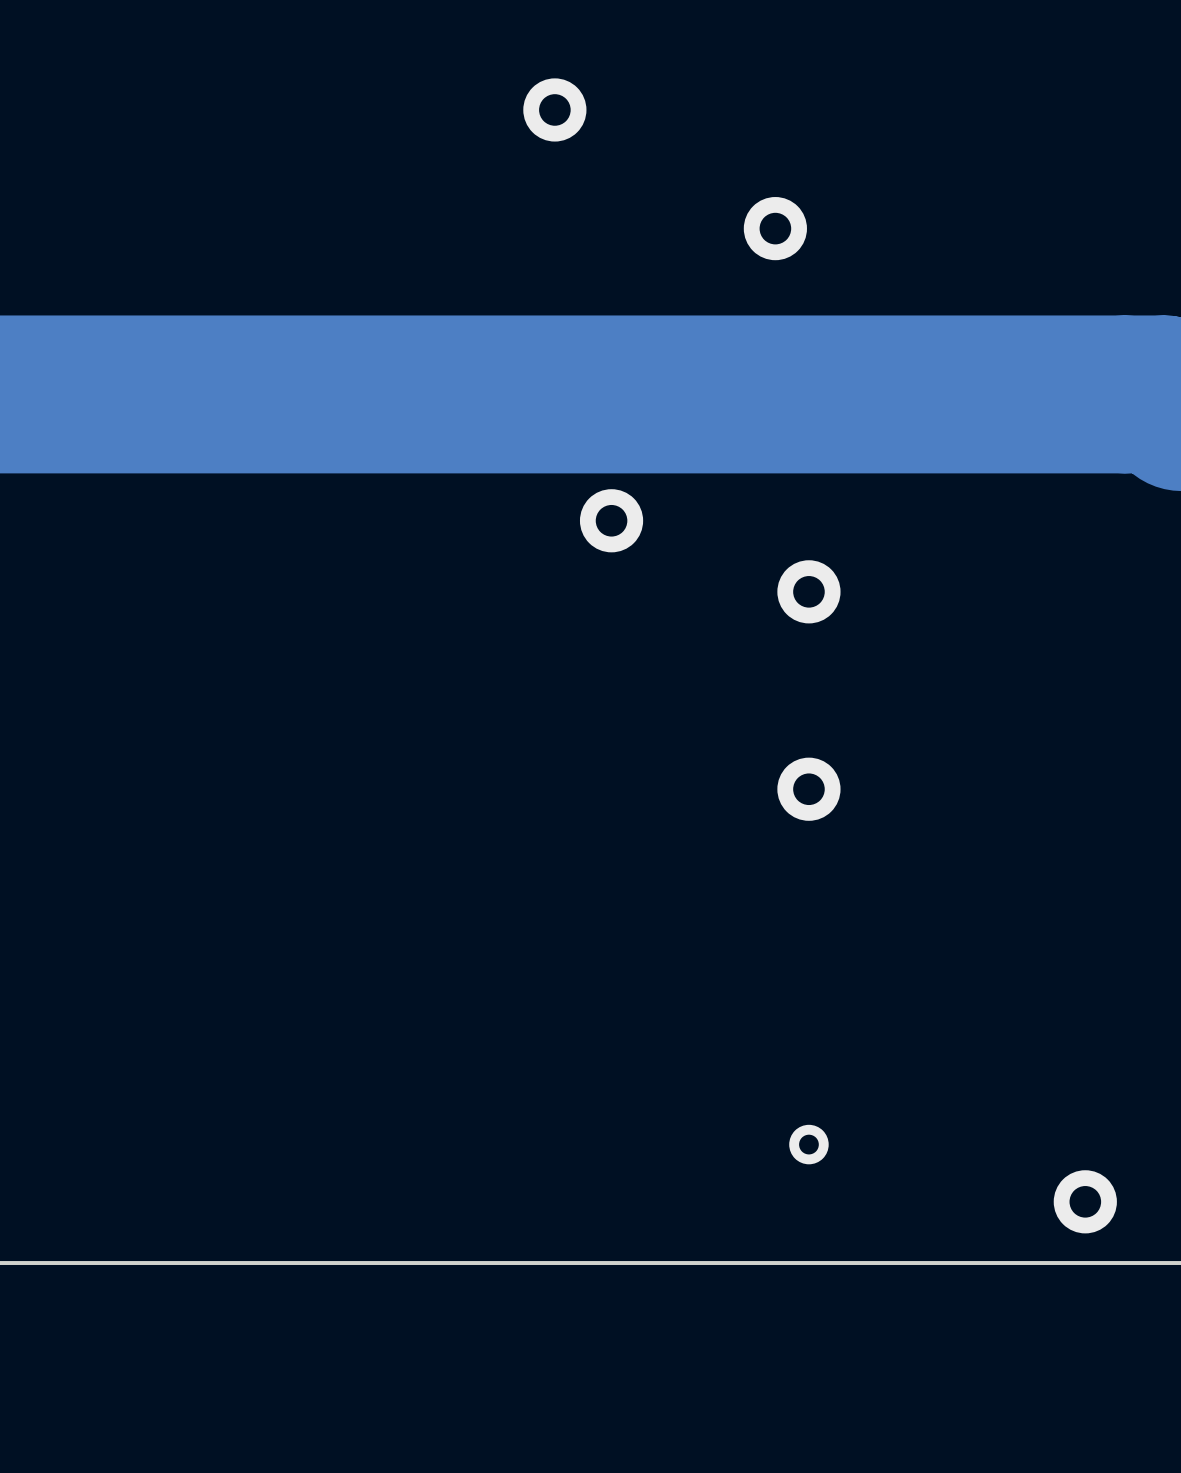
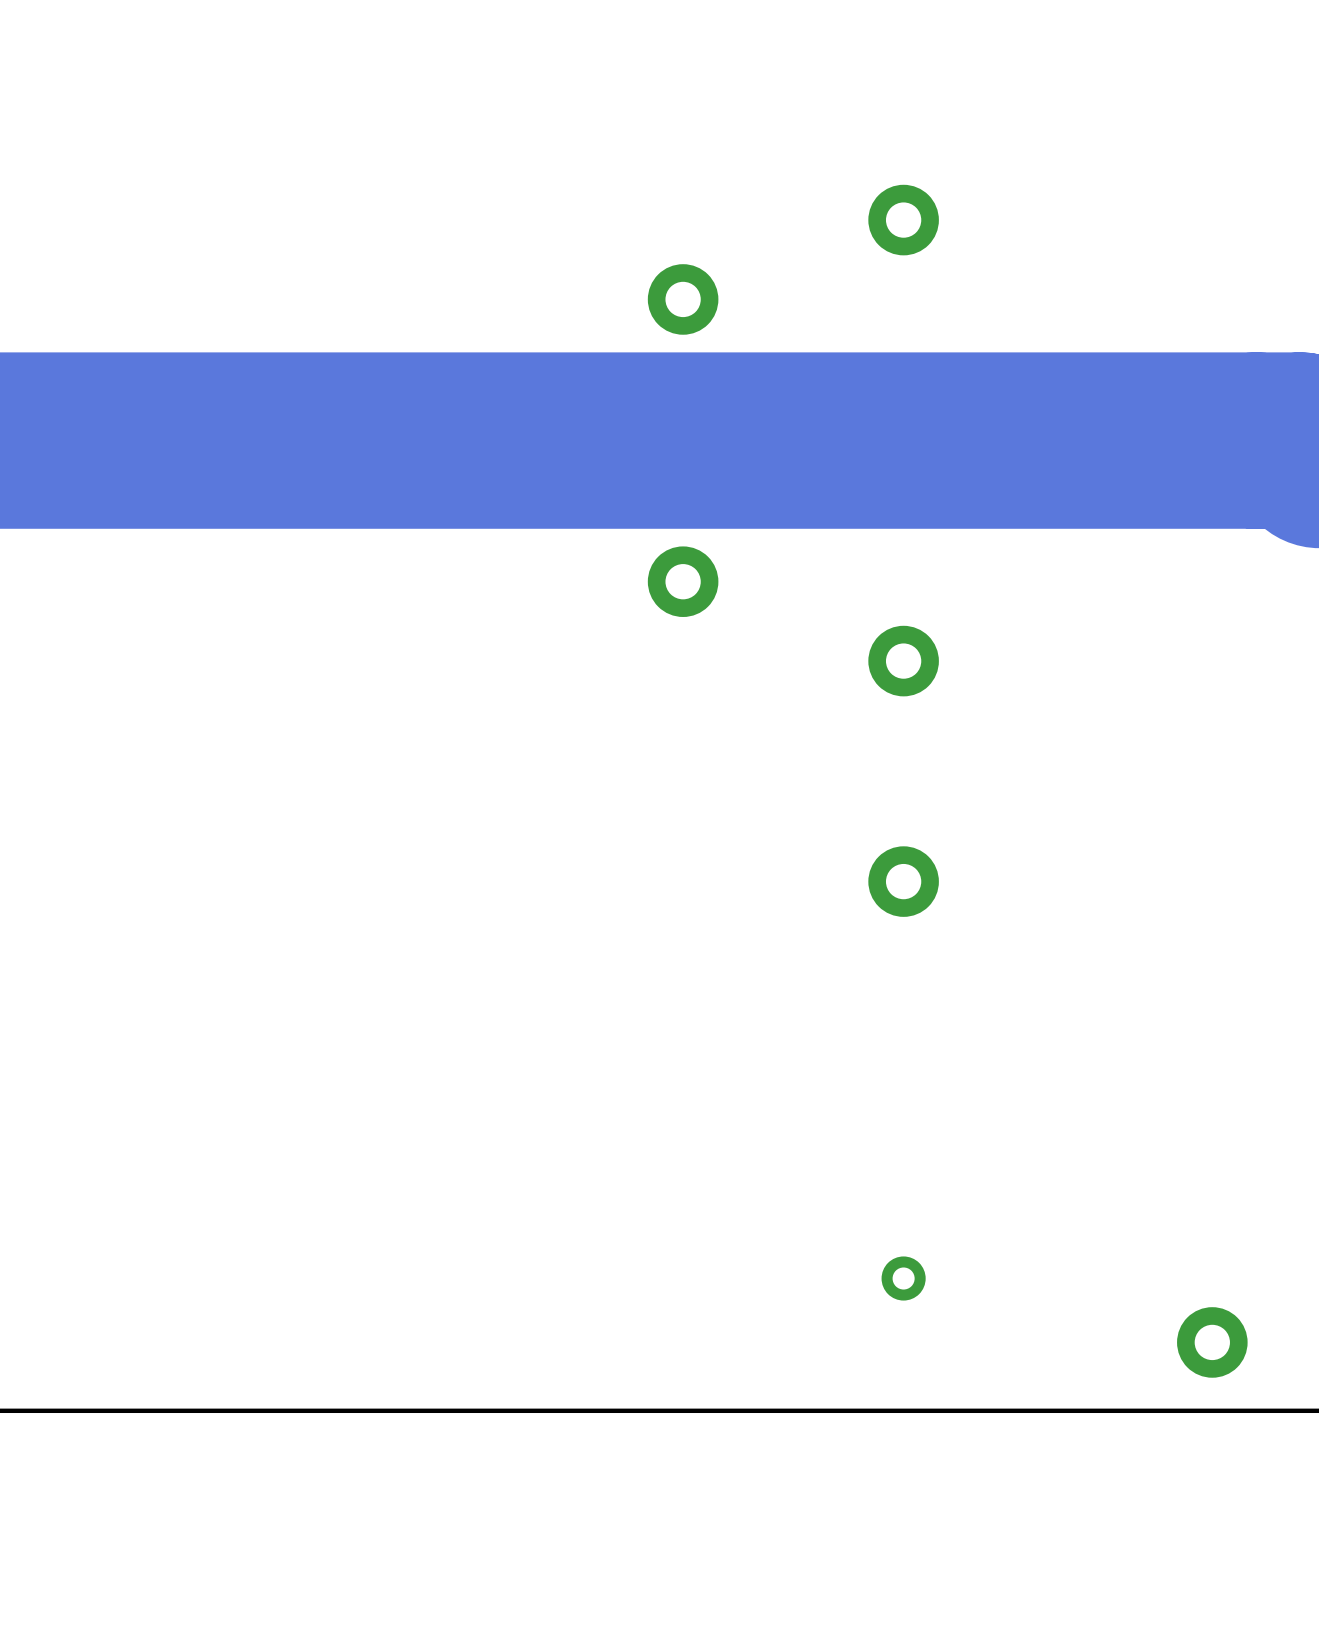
via: (554, 109) -> none
via position: (775, 228) -> (903, 220)
via: none -> (683, 299)

